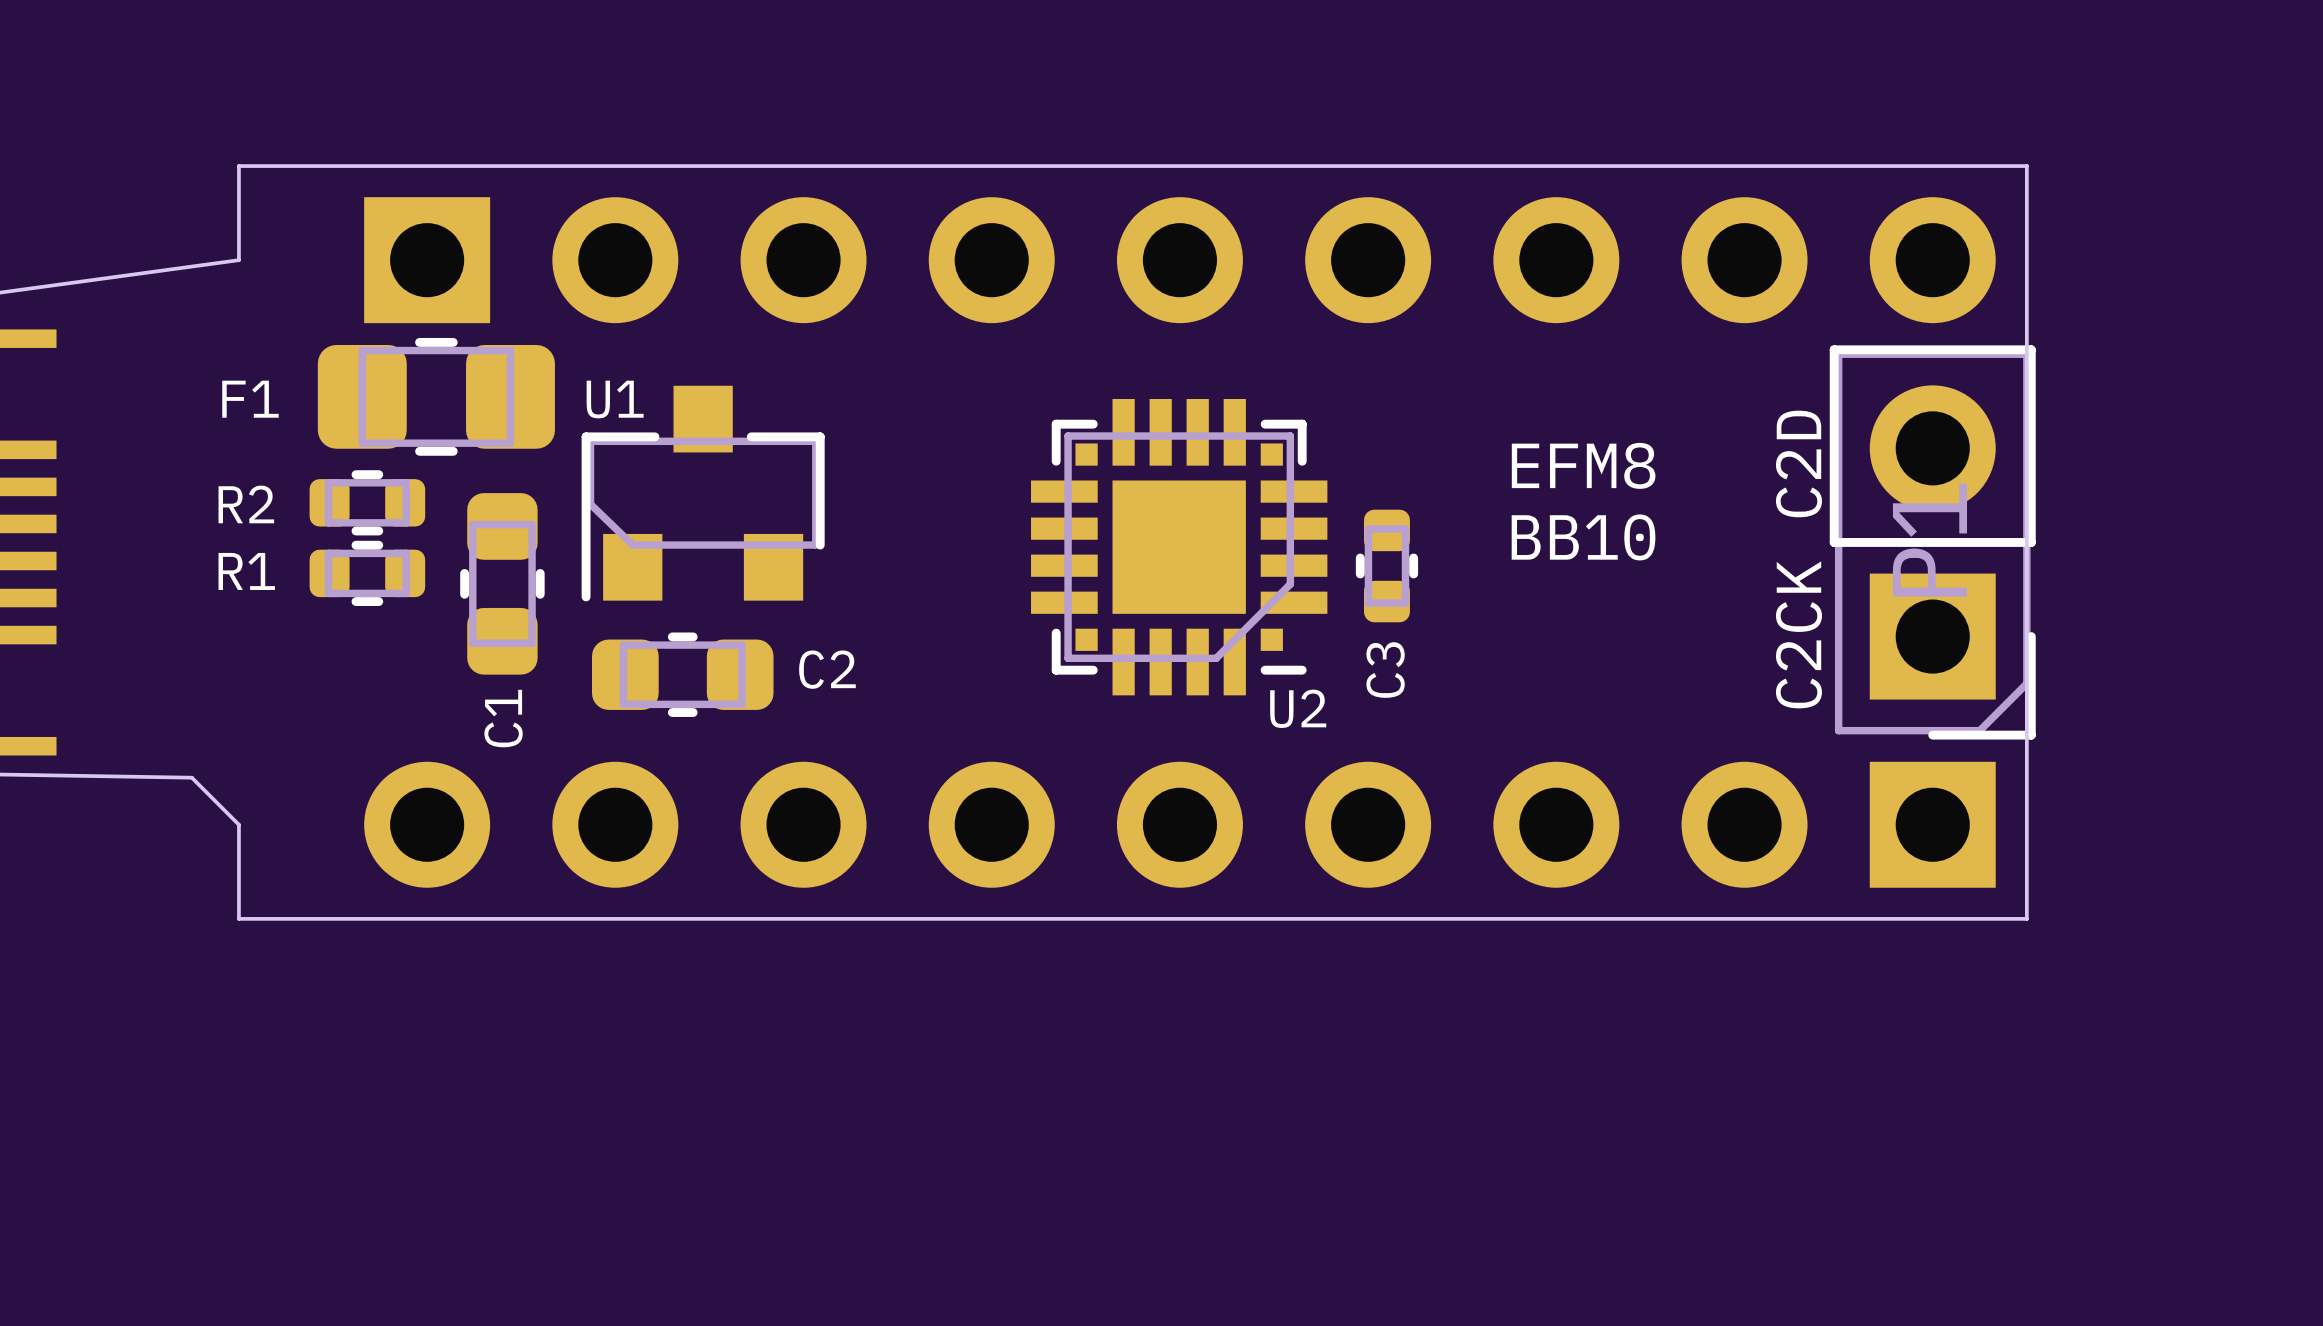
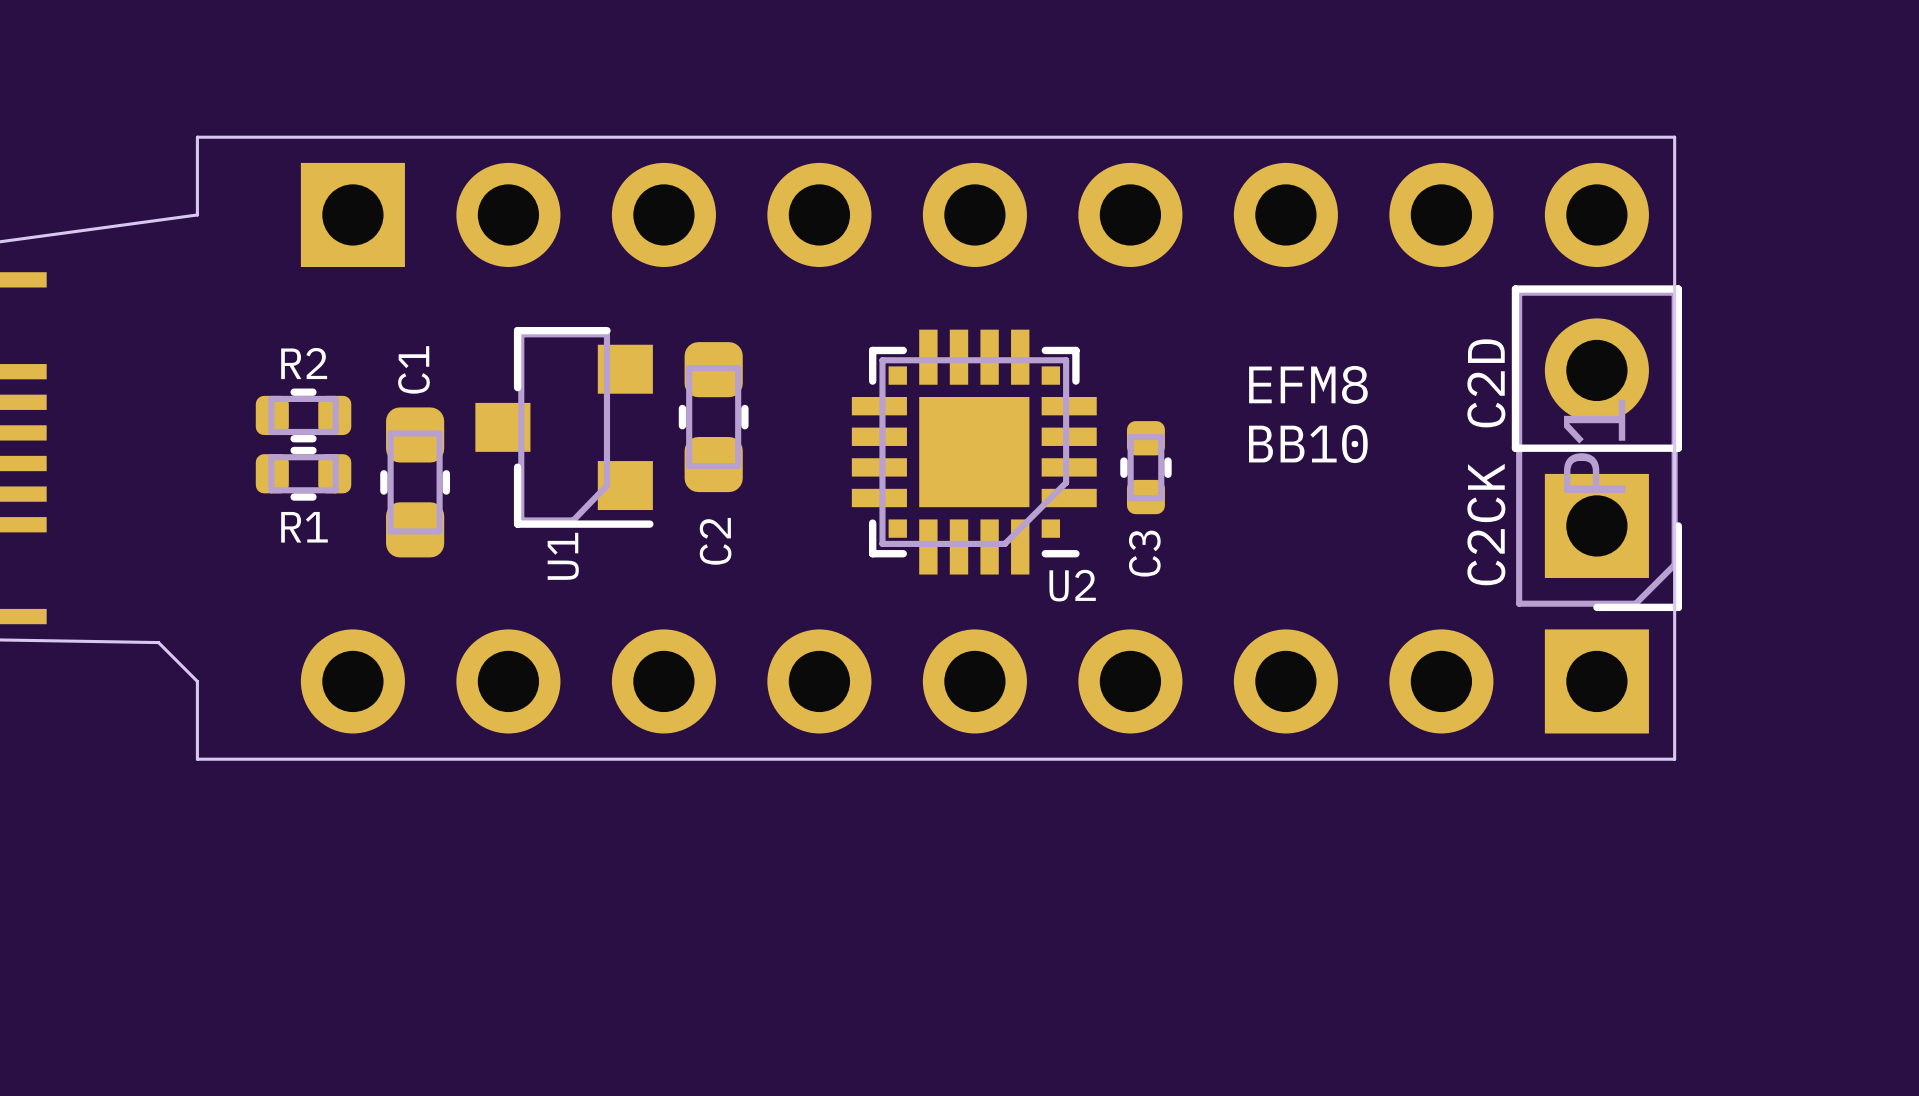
F1: (436, 396) -> none
U1 rotation: 0° (703, 493) -> 90° counterclockwise (564, 427)
R2 name position: R2 (246, 504) -> R2 (304, 363)
R1 name position: R1 (246, 571) -> R1 (304, 527)
C2 rotation: 0° (682, 674) -> 90° clockwise (713, 417)
C2 position: (682, 674) -> (713, 417)
C1 name position: C1 (503, 718) -> C1 (413, 369)

